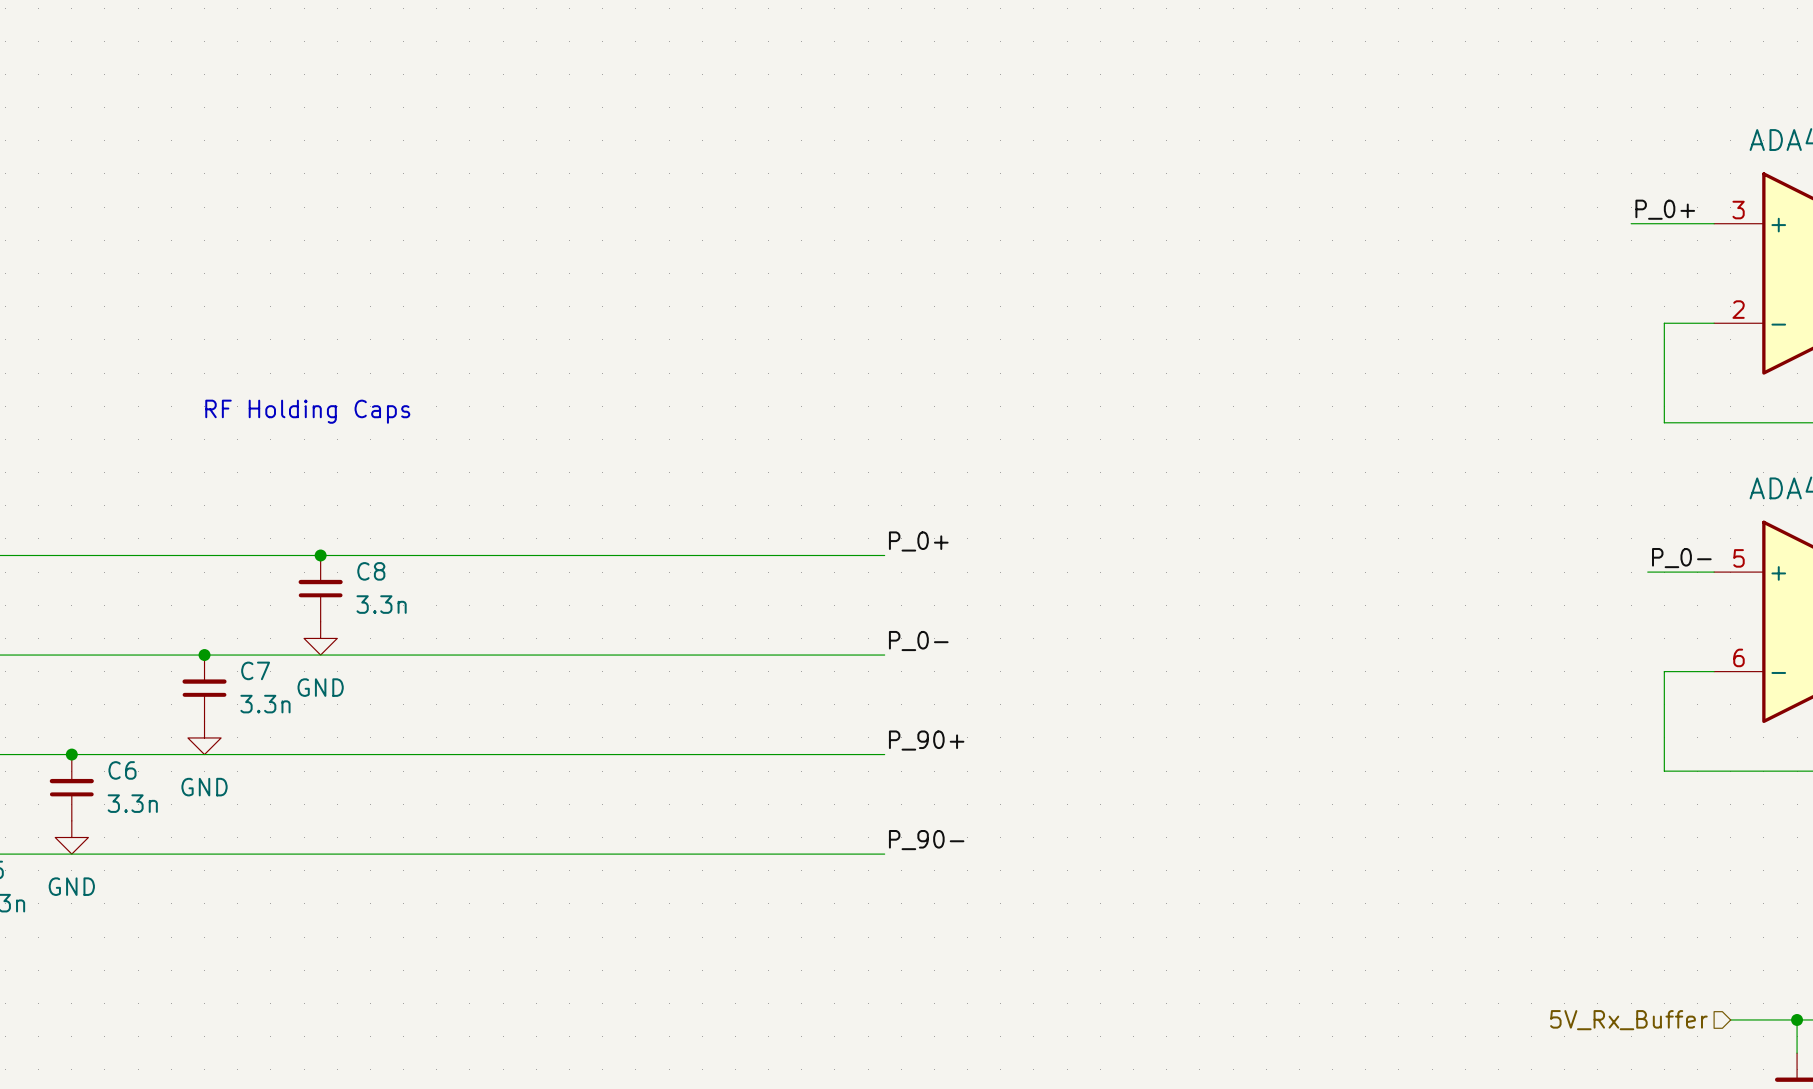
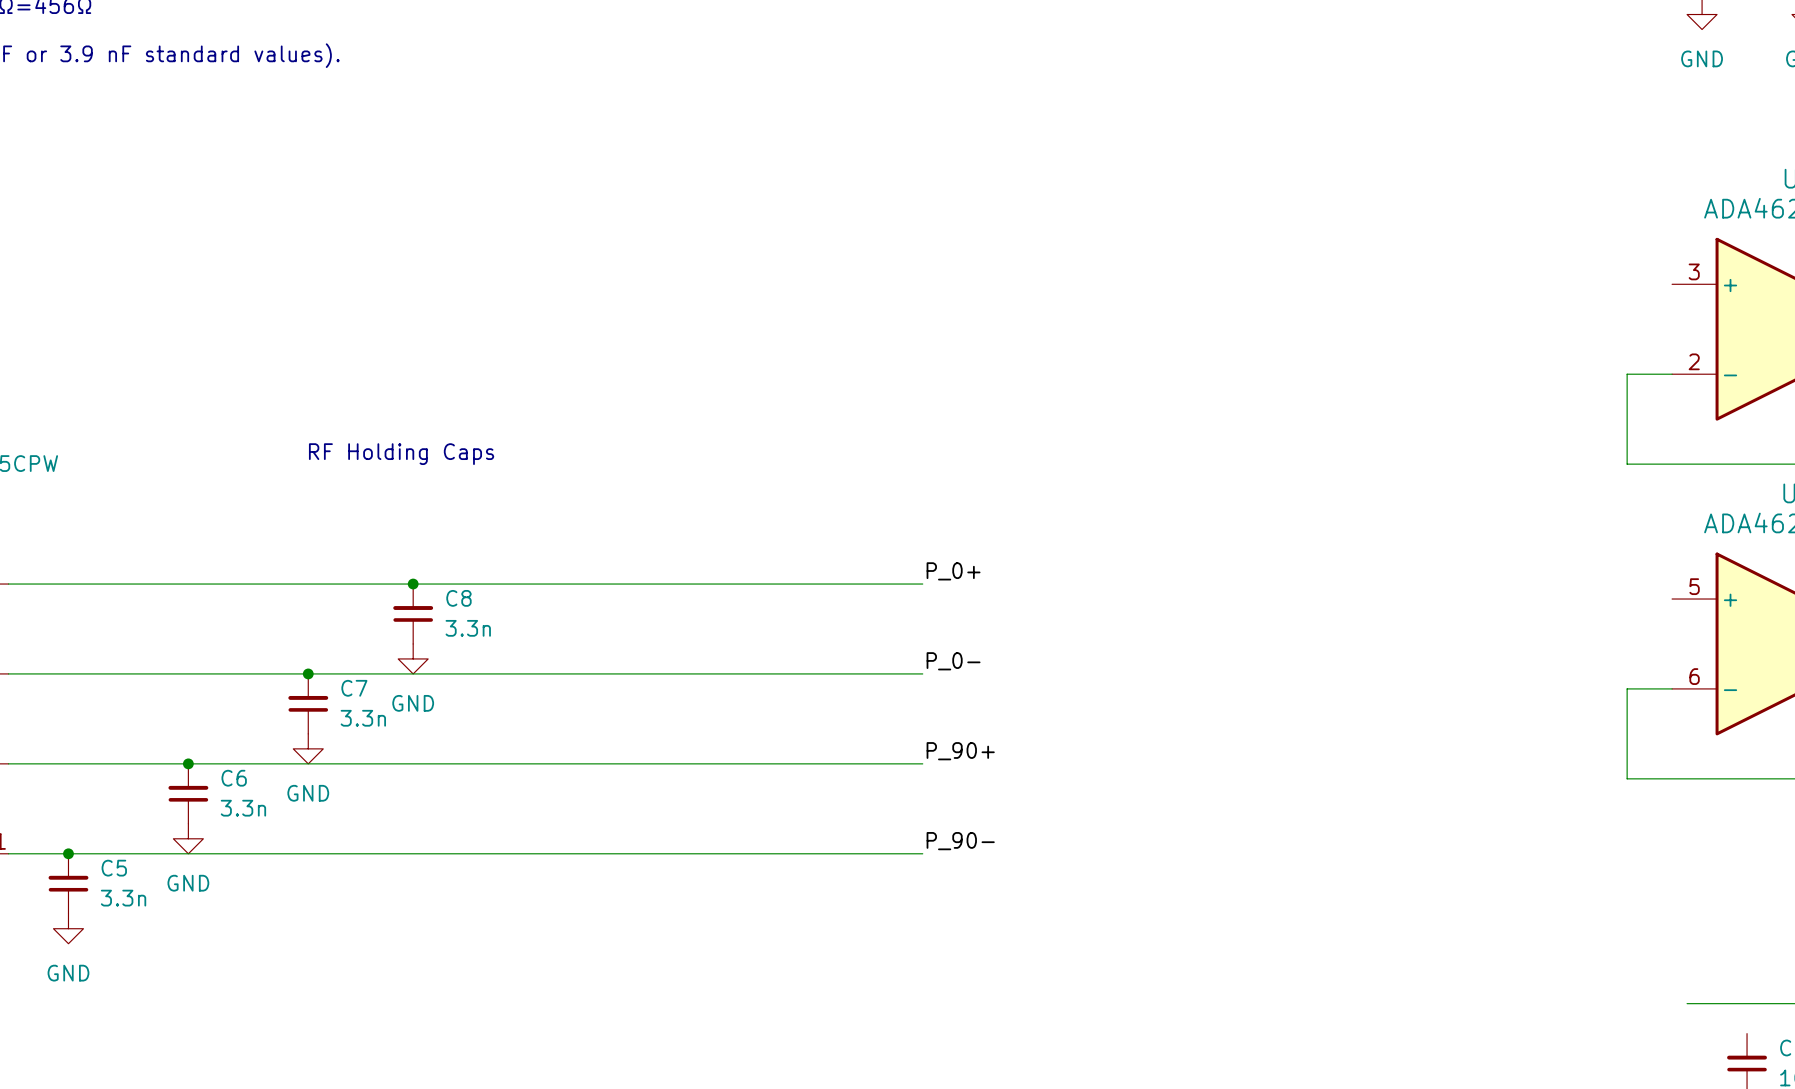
label: P_0+ (1665, 209) -> none
wire: (1631, 223) (1714, 223) -> none
label: P_0- (1681, 558) -> none
wire: (1647, 572) (1714, 572) -> none
wire: (1797, 1019) (1797, 1053) -> none
junction: (1797, 1019) -> none
hierarchical label: 5V_Rx_Buffer (1628, 1020) -> none

